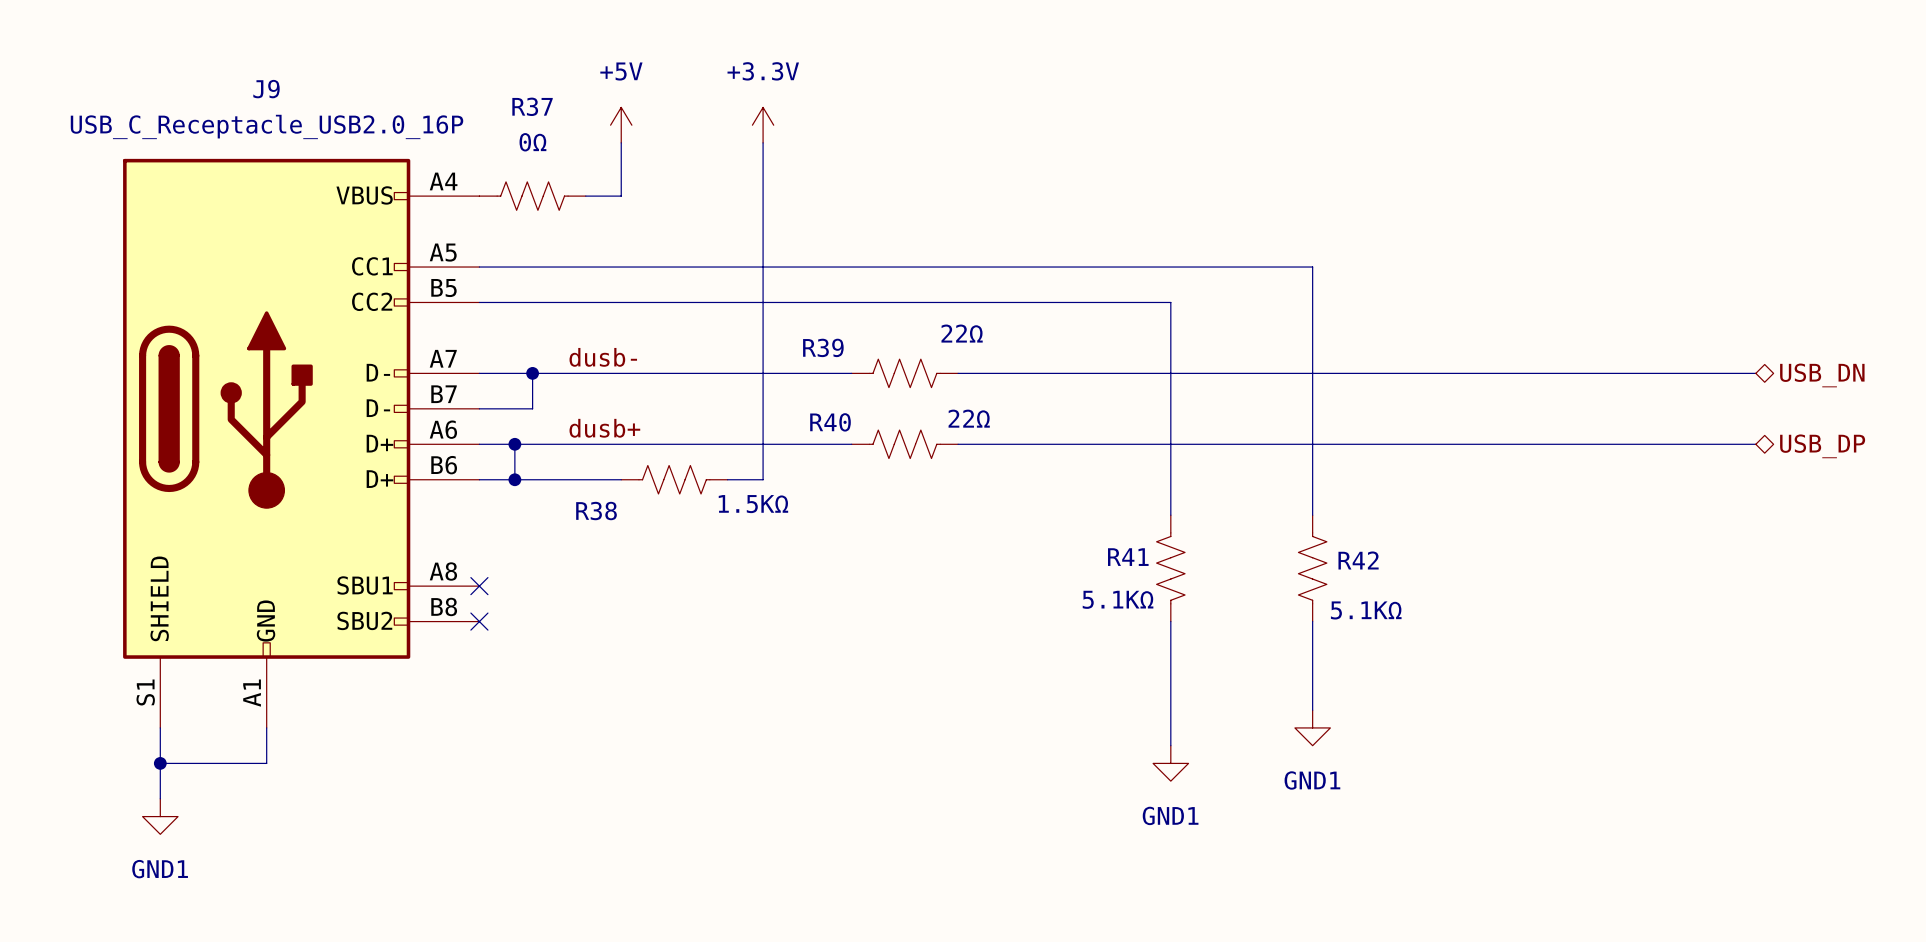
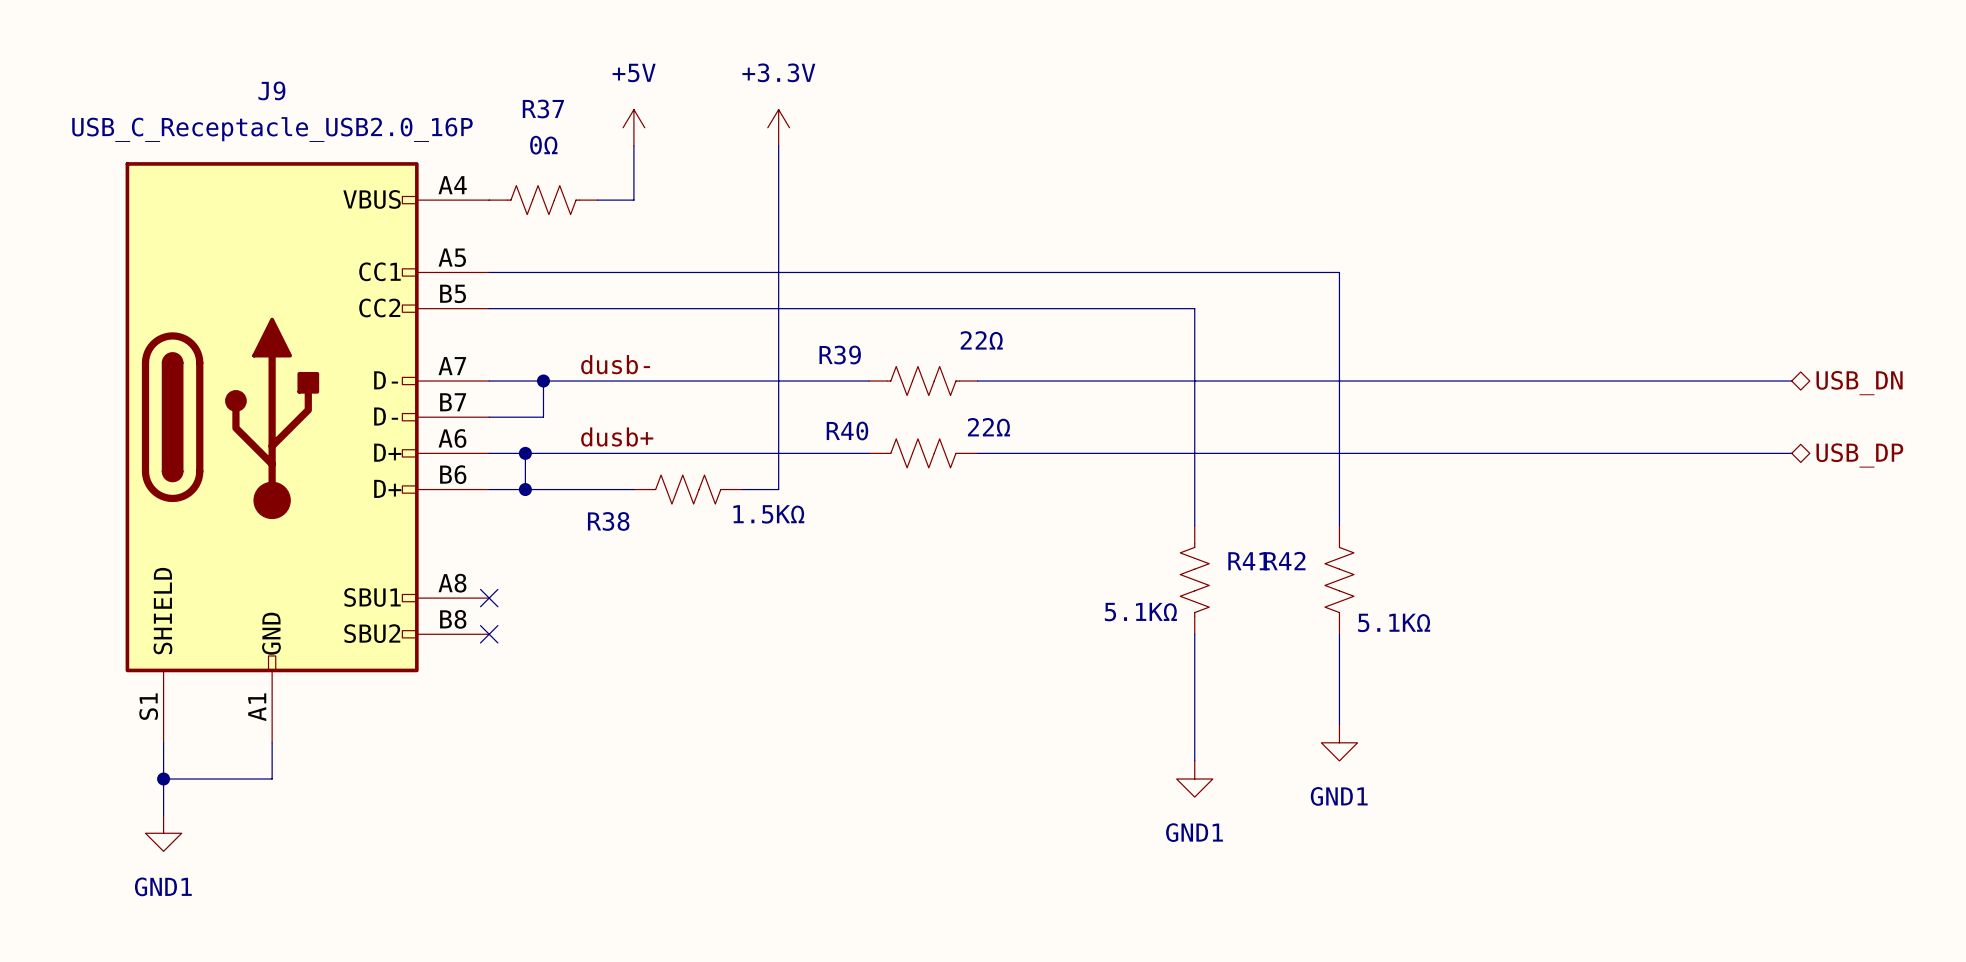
R41 name position: R41 (1128, 557) -> R41 (1249, 561)
R42 name position: R42 (1358, 560) -> R42 (1284, 561)

